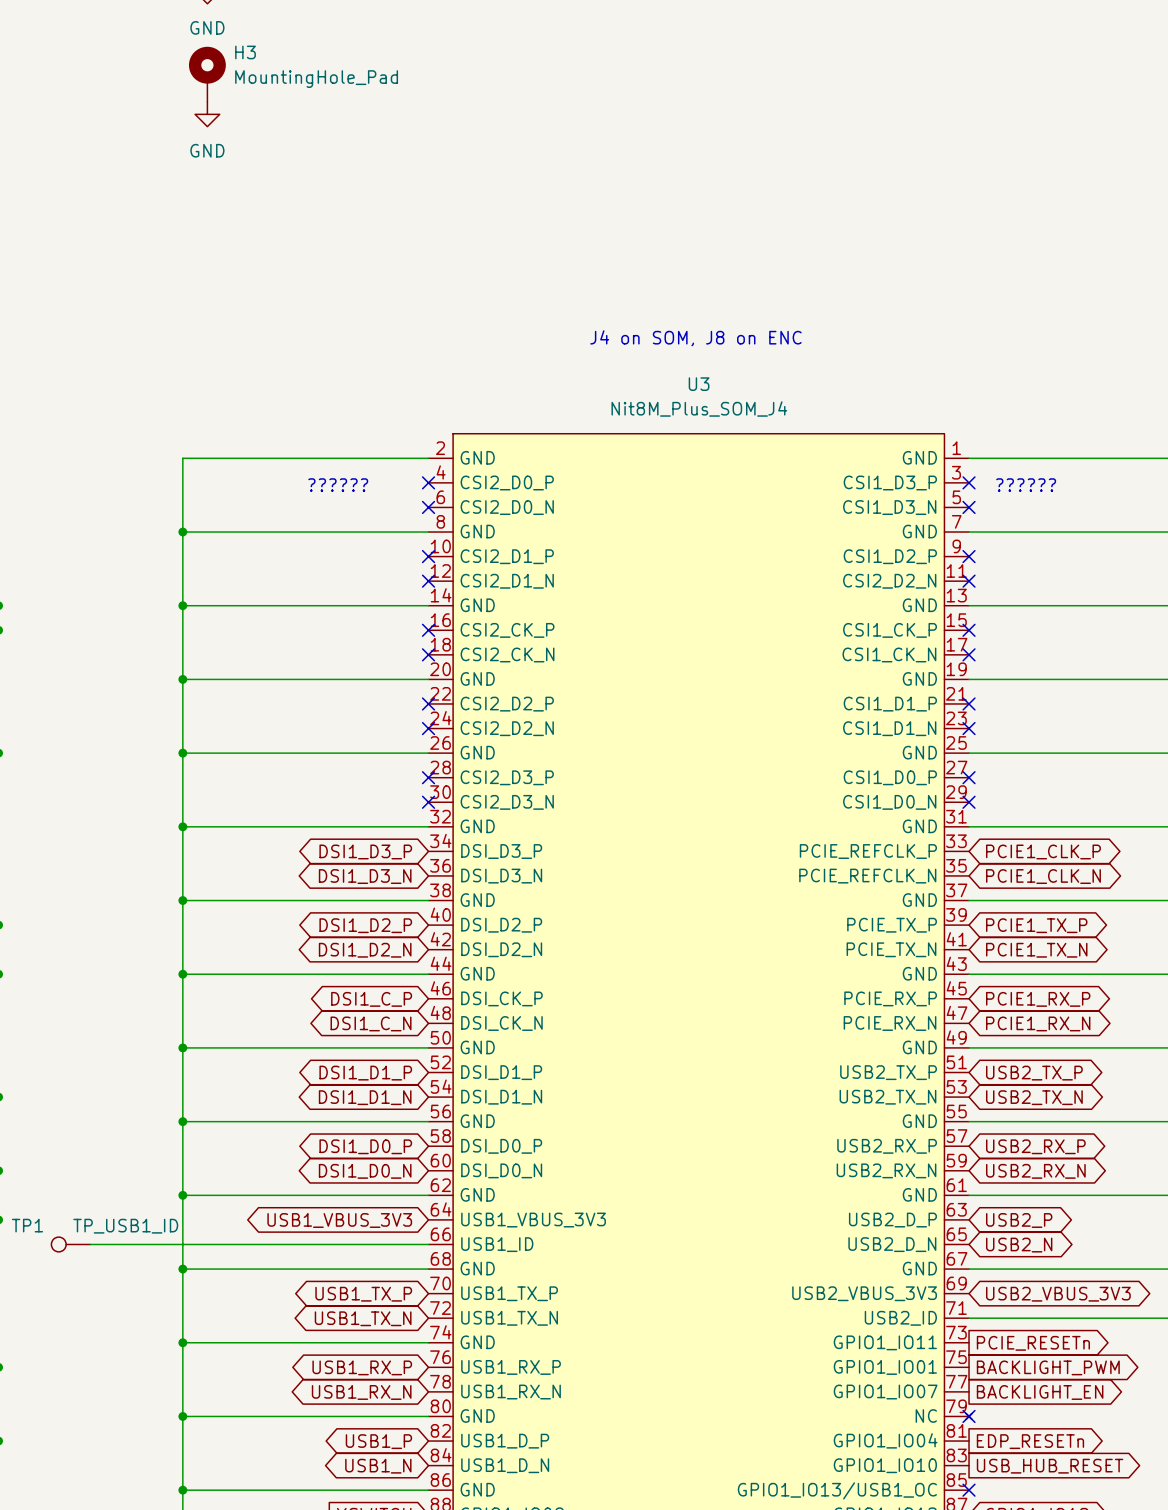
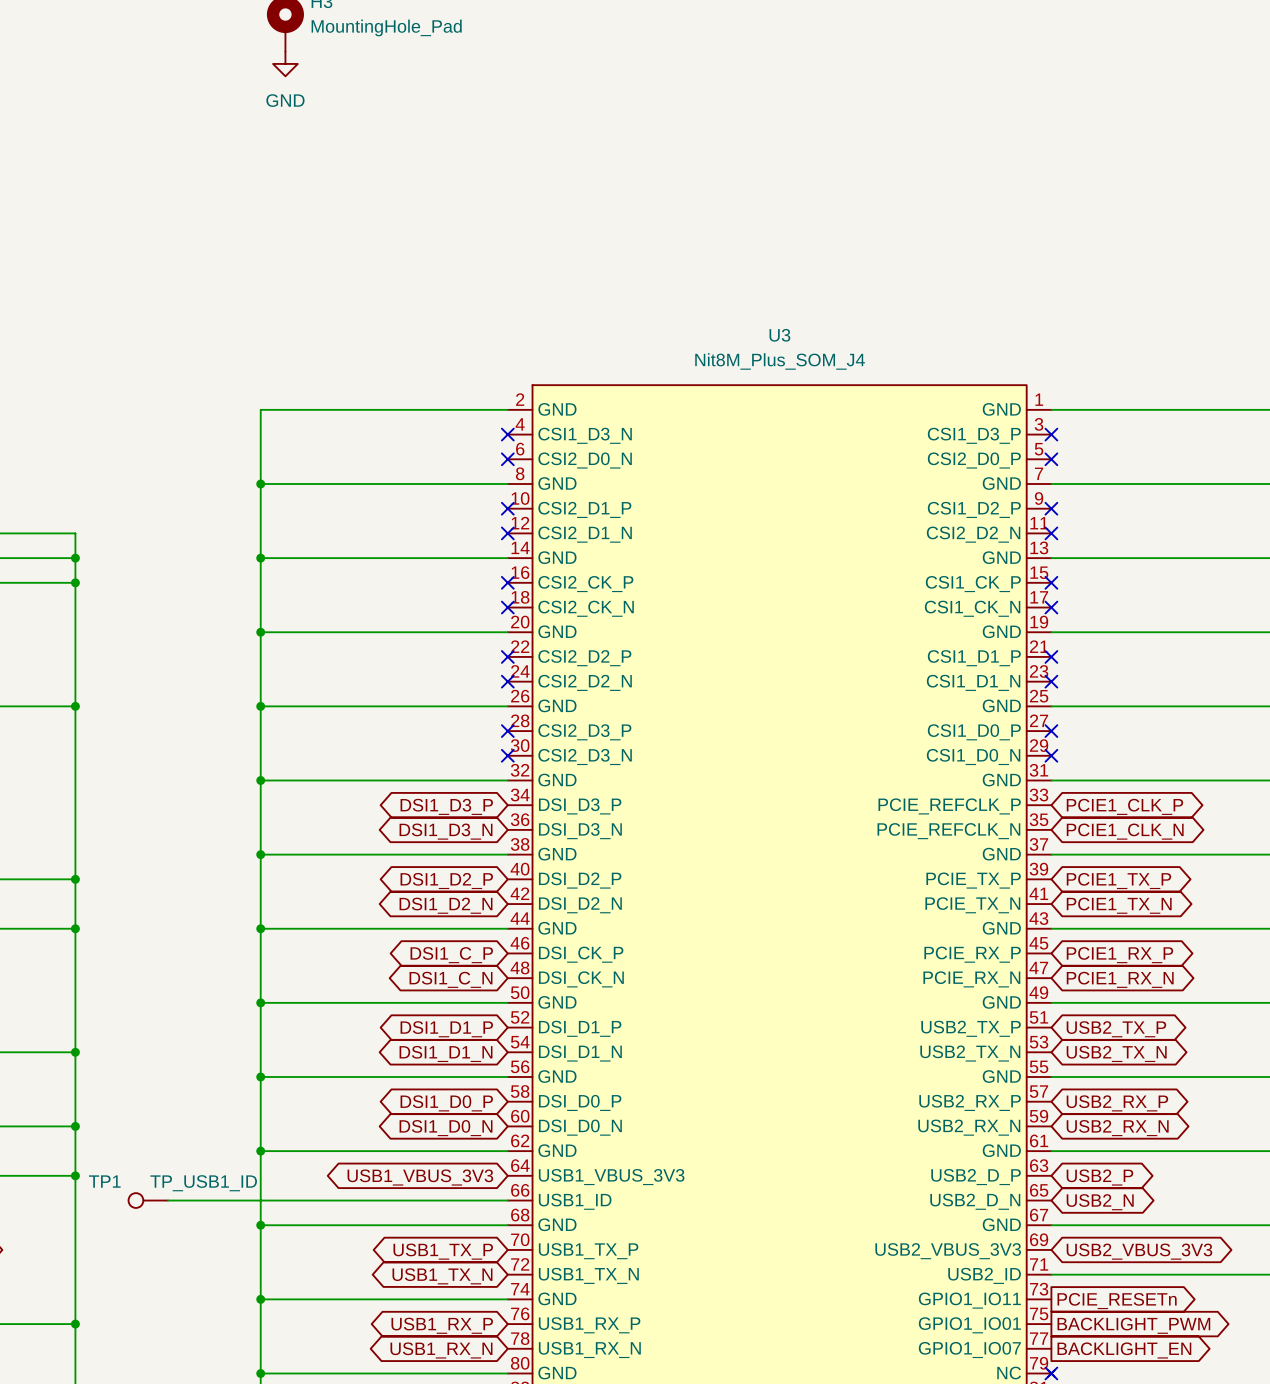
text: J4 on SOM, J8 on ENC (695, 338) -> none
U3 pin name: CSI2_D0_P (507, 483) -> CSI1_D3_N (585, 435)
text: ?????? (338, 485) -> none
text: ?????? (1026, 485) -> none
U3 pin name: CSI1_D3_N (889, 507) -> CSI2_D0_P (974, 460)

